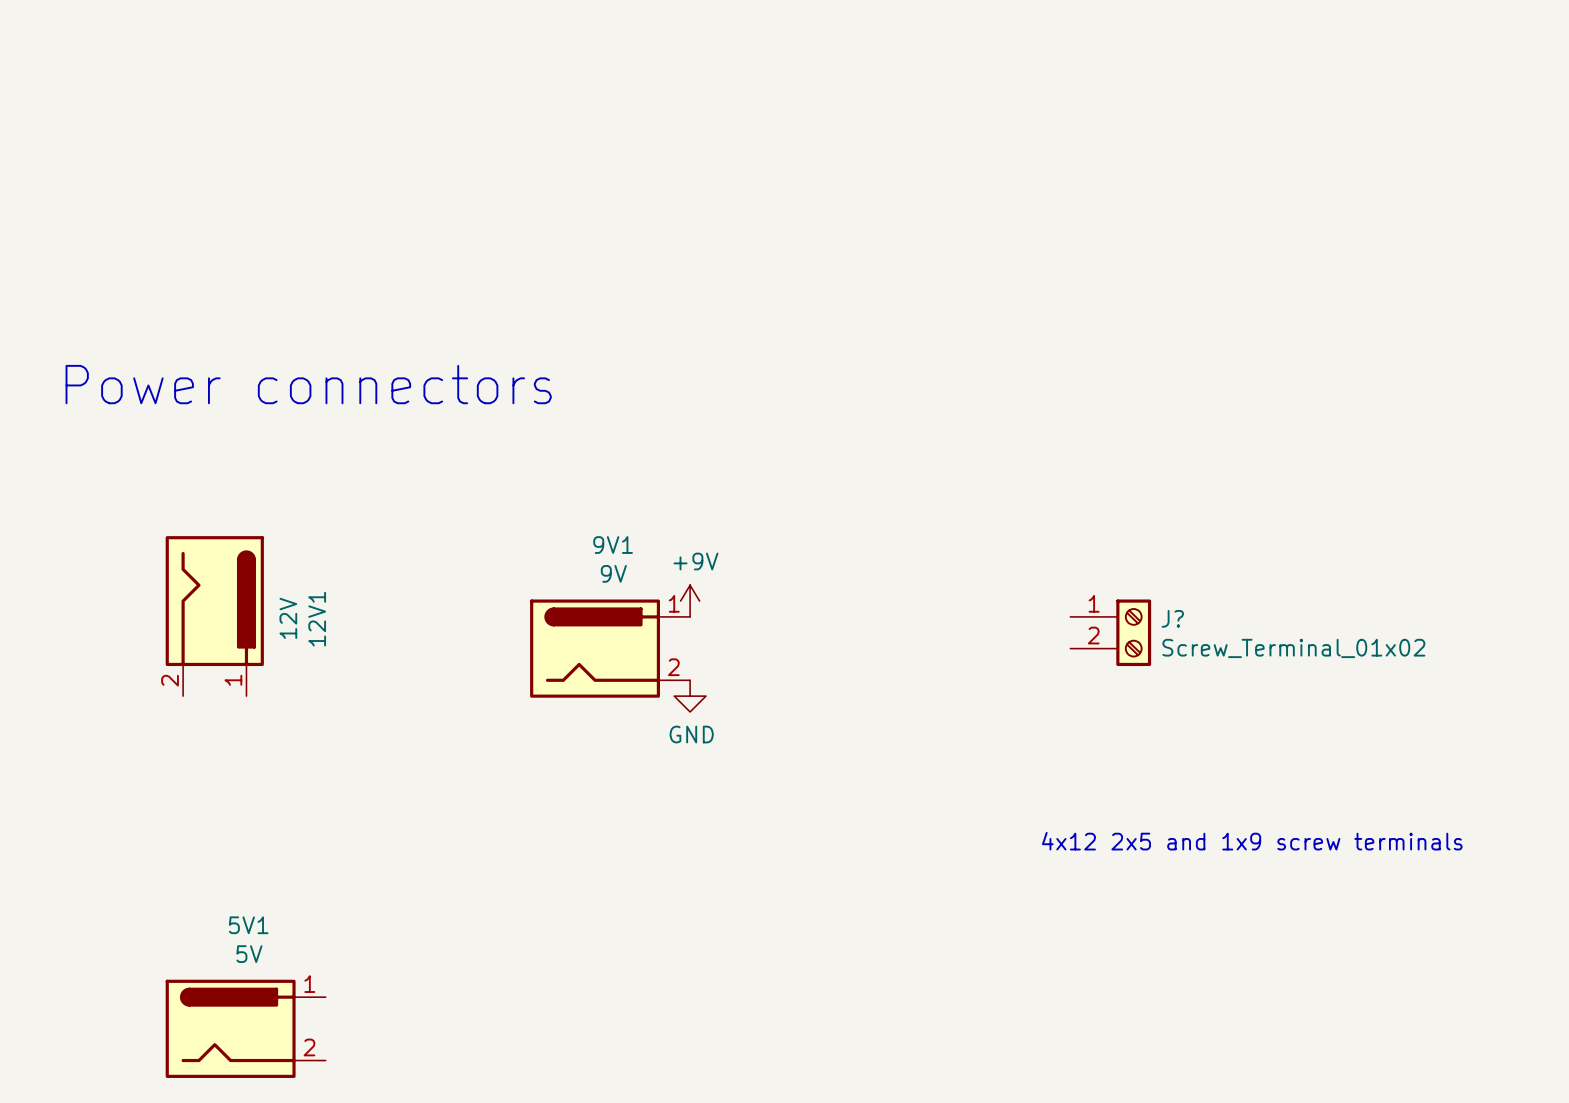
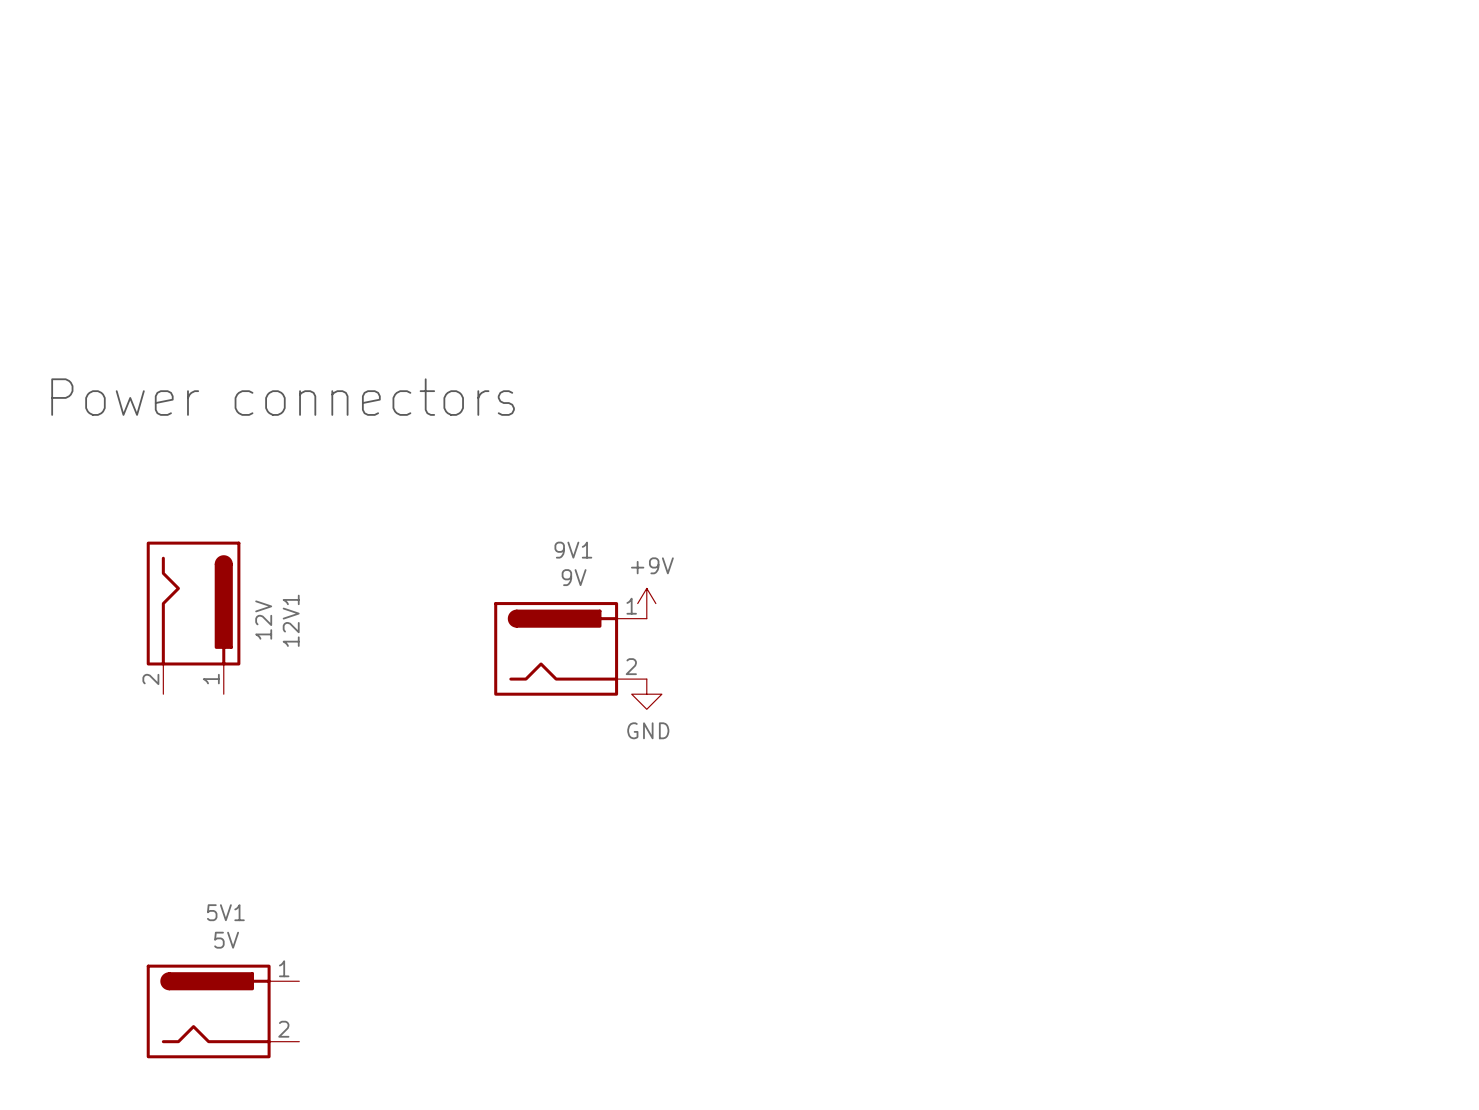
J?: Screw_Terminal_01x02 (1110, 632) -> none
text: 4x12 2x5 and 1x9 screw terminals (1252, 841) -> none

